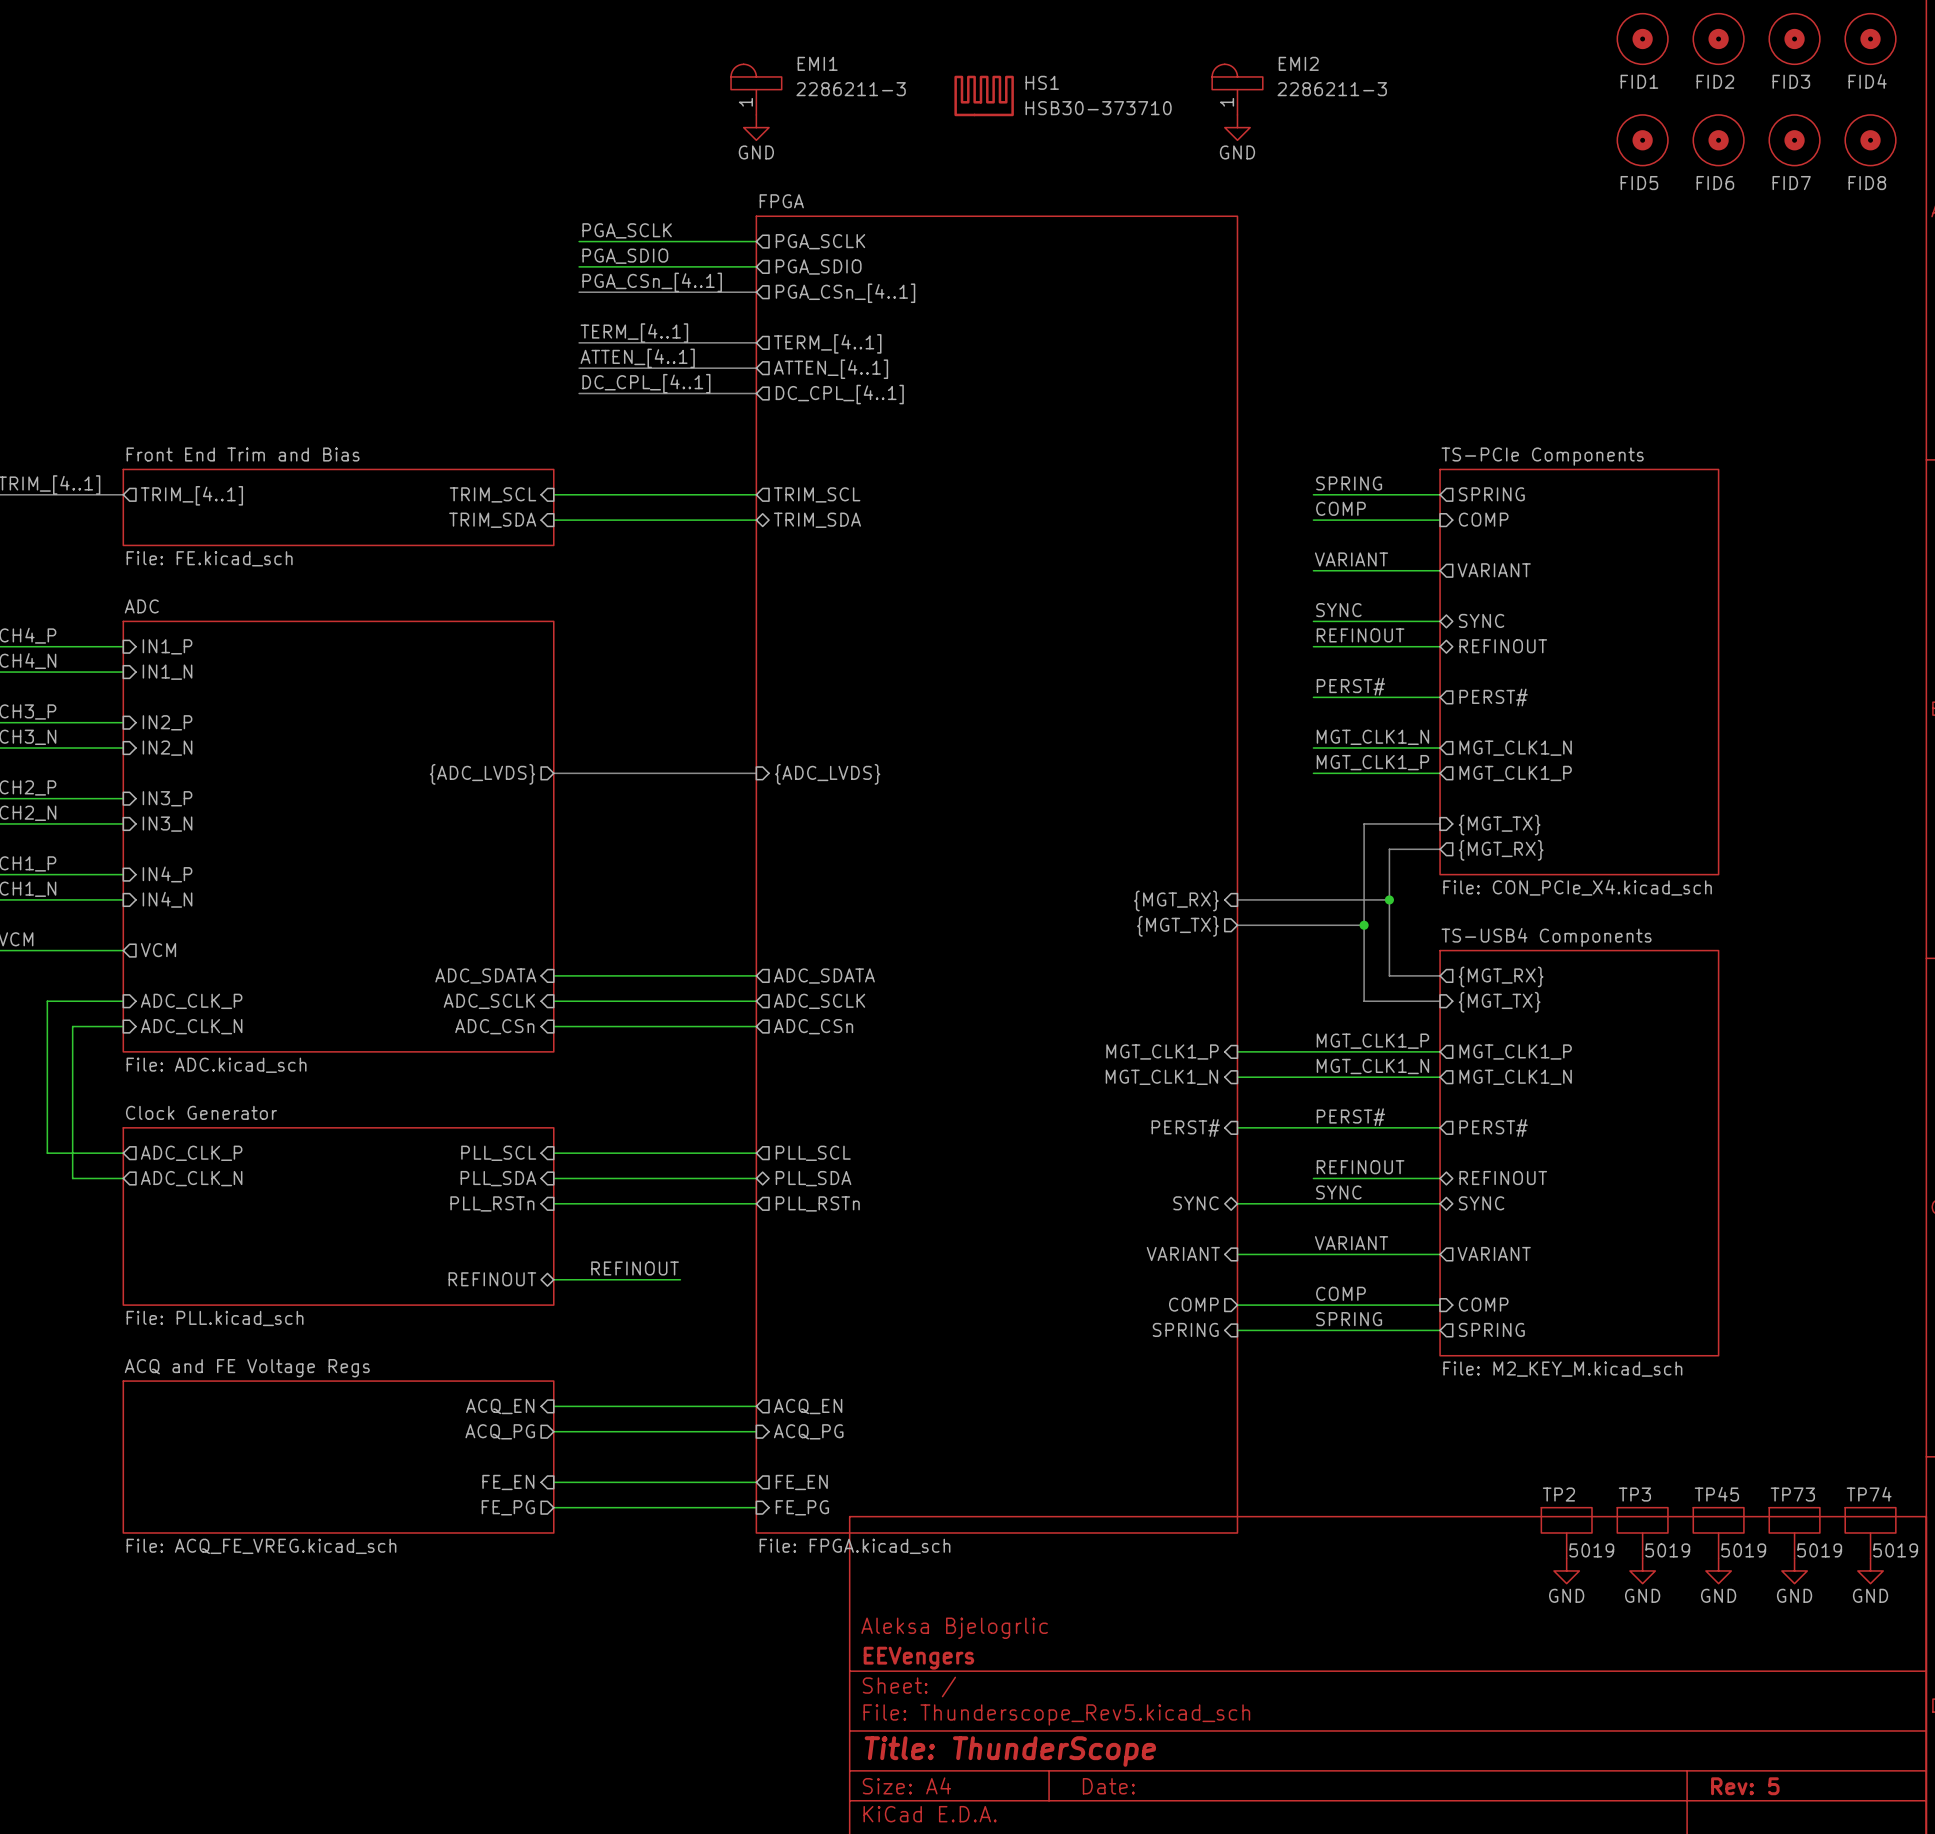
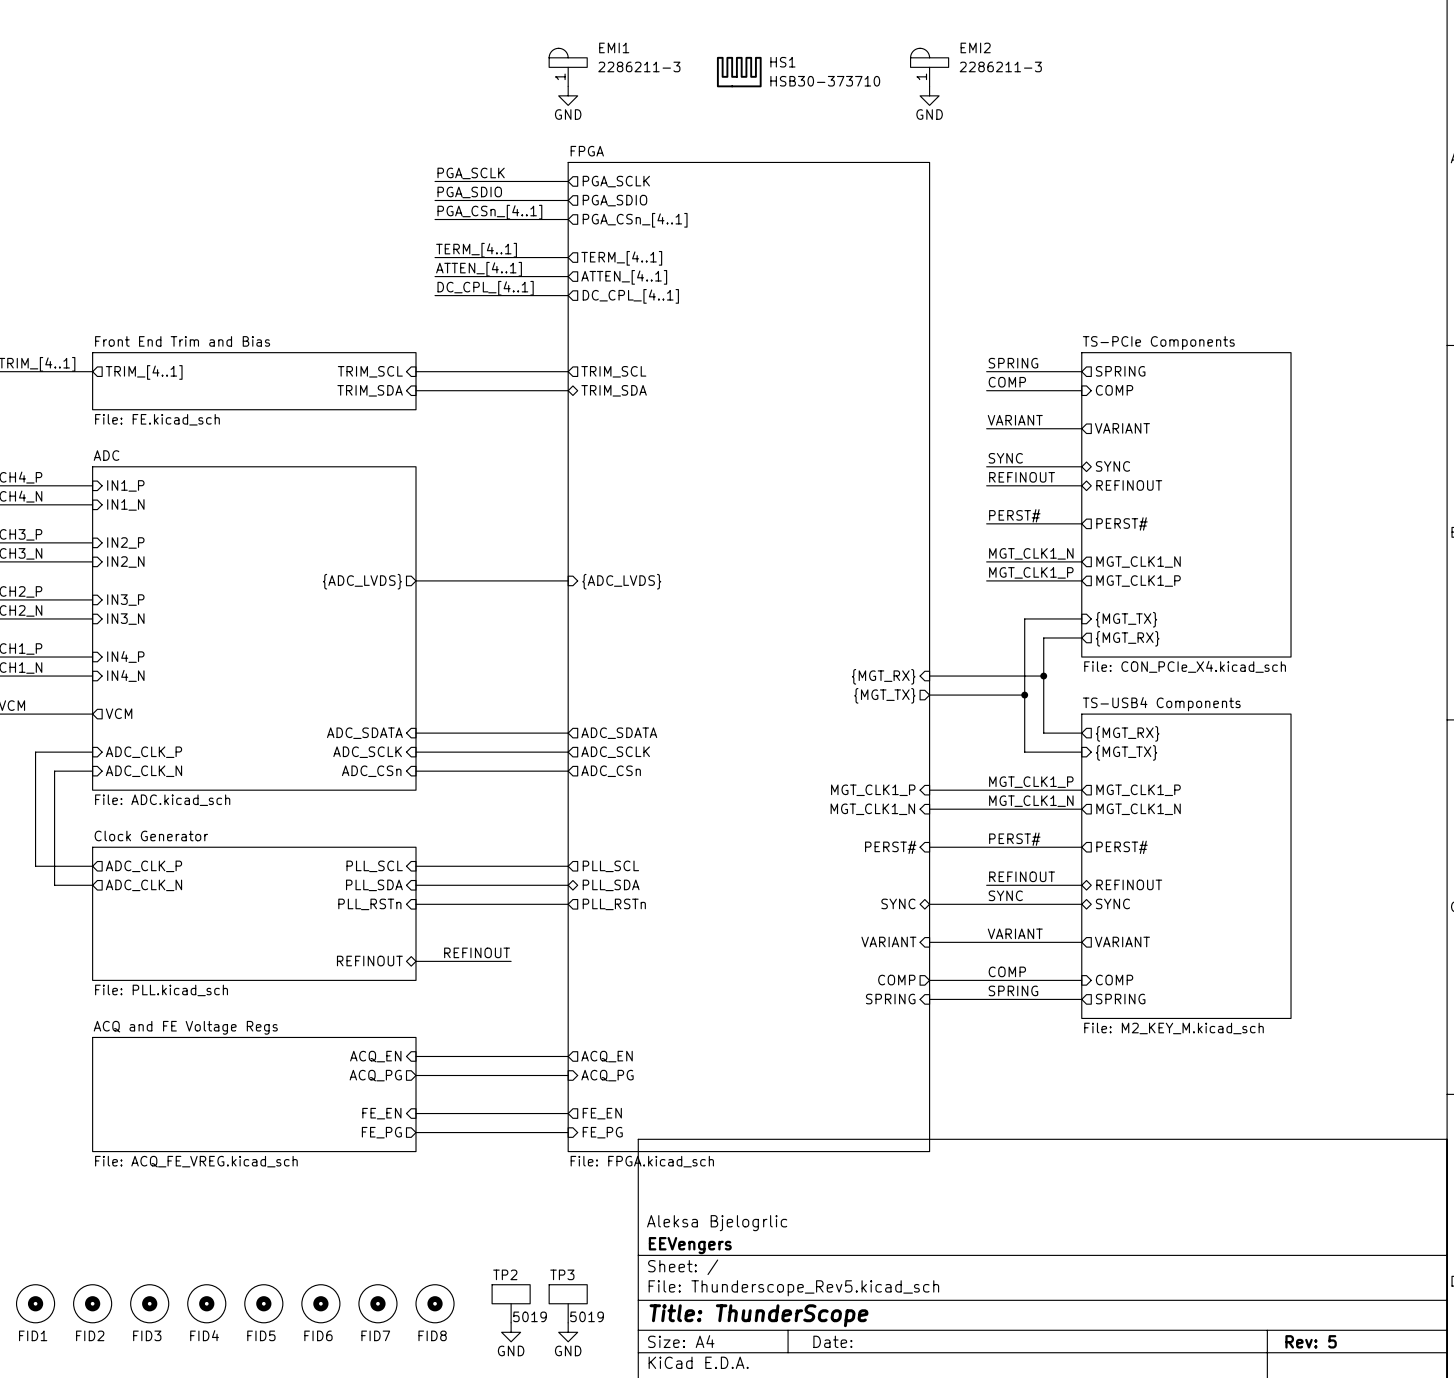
FID1 position: (1642, 38) -> (35, 1303)
FID2 position: (1718, 38) -> (92, 1303)
FID3 position: (1794, 38) -> (149, 1303)
FID4 position: (1870, 38) -> (206, 1303)
FID5 position: (1642, 140) -> (263, 1303)
FID6 position: (1718, 140) -> (320, 1303)
FID7 position: (1794, 140) -> (377, 1303)
FID8 position: (1870, 140) -> (435, 1303)
TP2 position: (1566, 1532) -> (511, 1303)
TP3 position: (1642, 1532) -> (568, 1303)
TP45: 5019 (1718, 1532) -> none
TP73: 5019 (1794, 1532) -> none
TP74: 5019 (1870, 1532) -> none
power symbol: GND (1566, 1570) -> none
power symbol: GND (1642, 1570) -> none
power symbol: GND (1718, 1570) -> none
power symbol: GND (1794, 1570) -> none
power symbol: GND (1870, 1570) -> none
power symbol: none -> GND (511, 1332)
power symbol: none -> GND (568, 1332)

